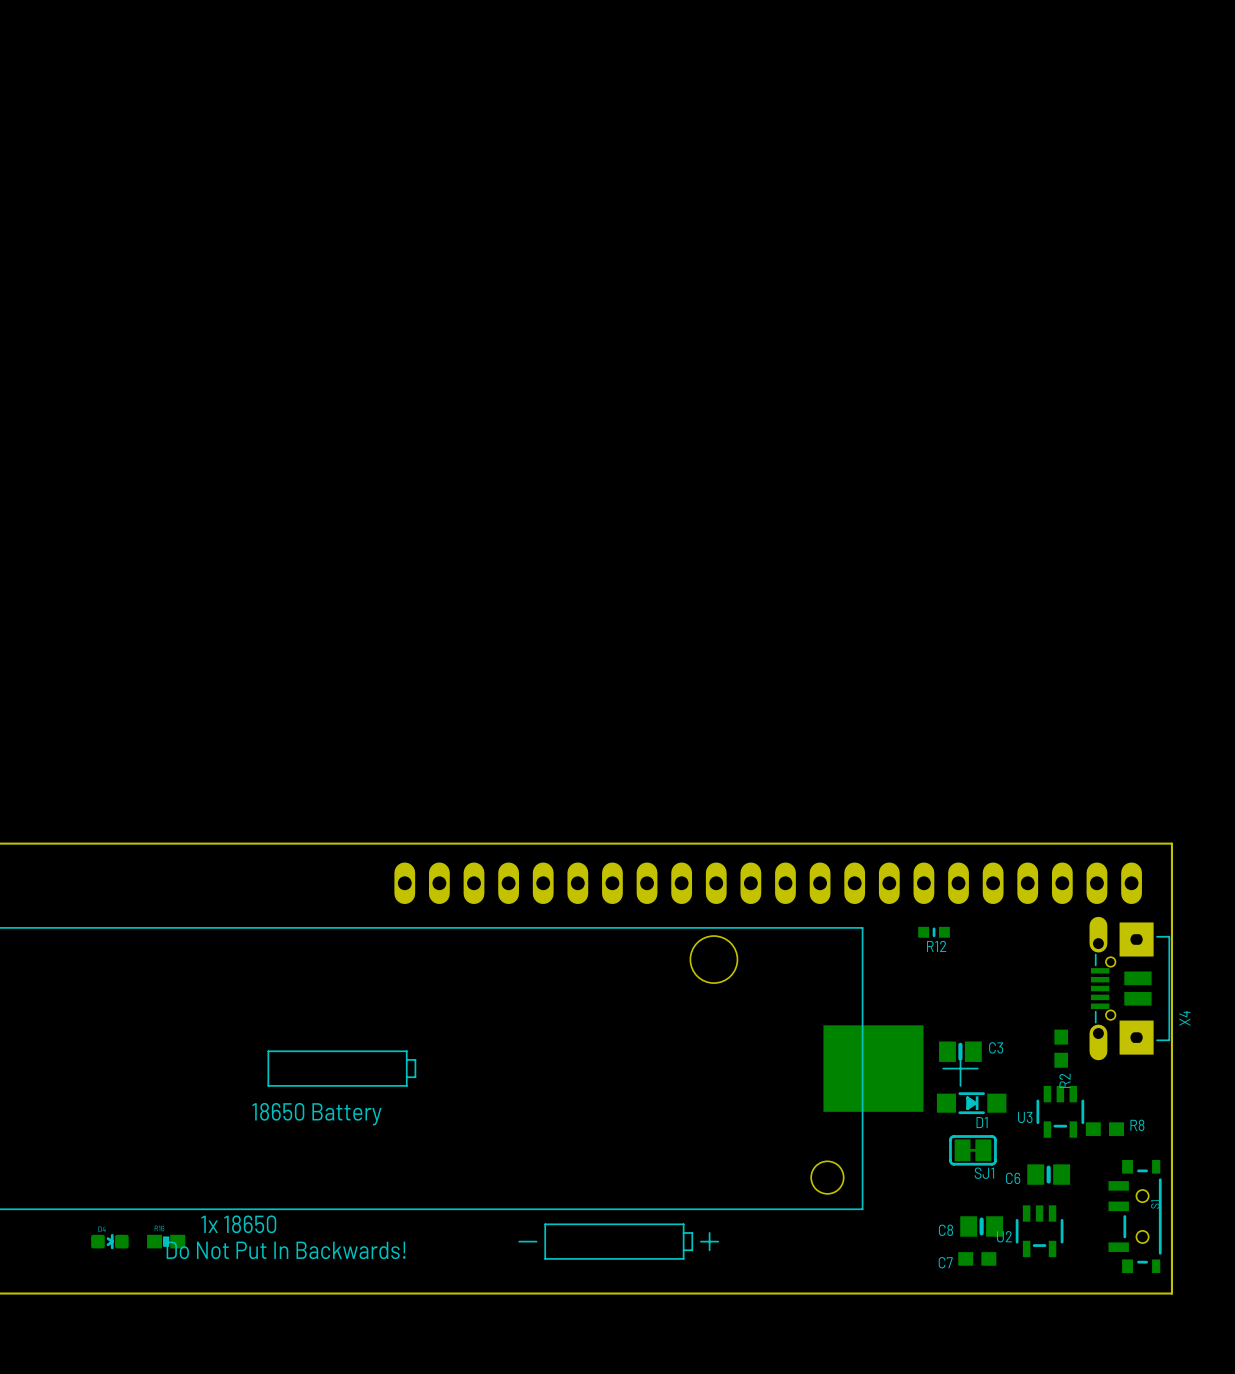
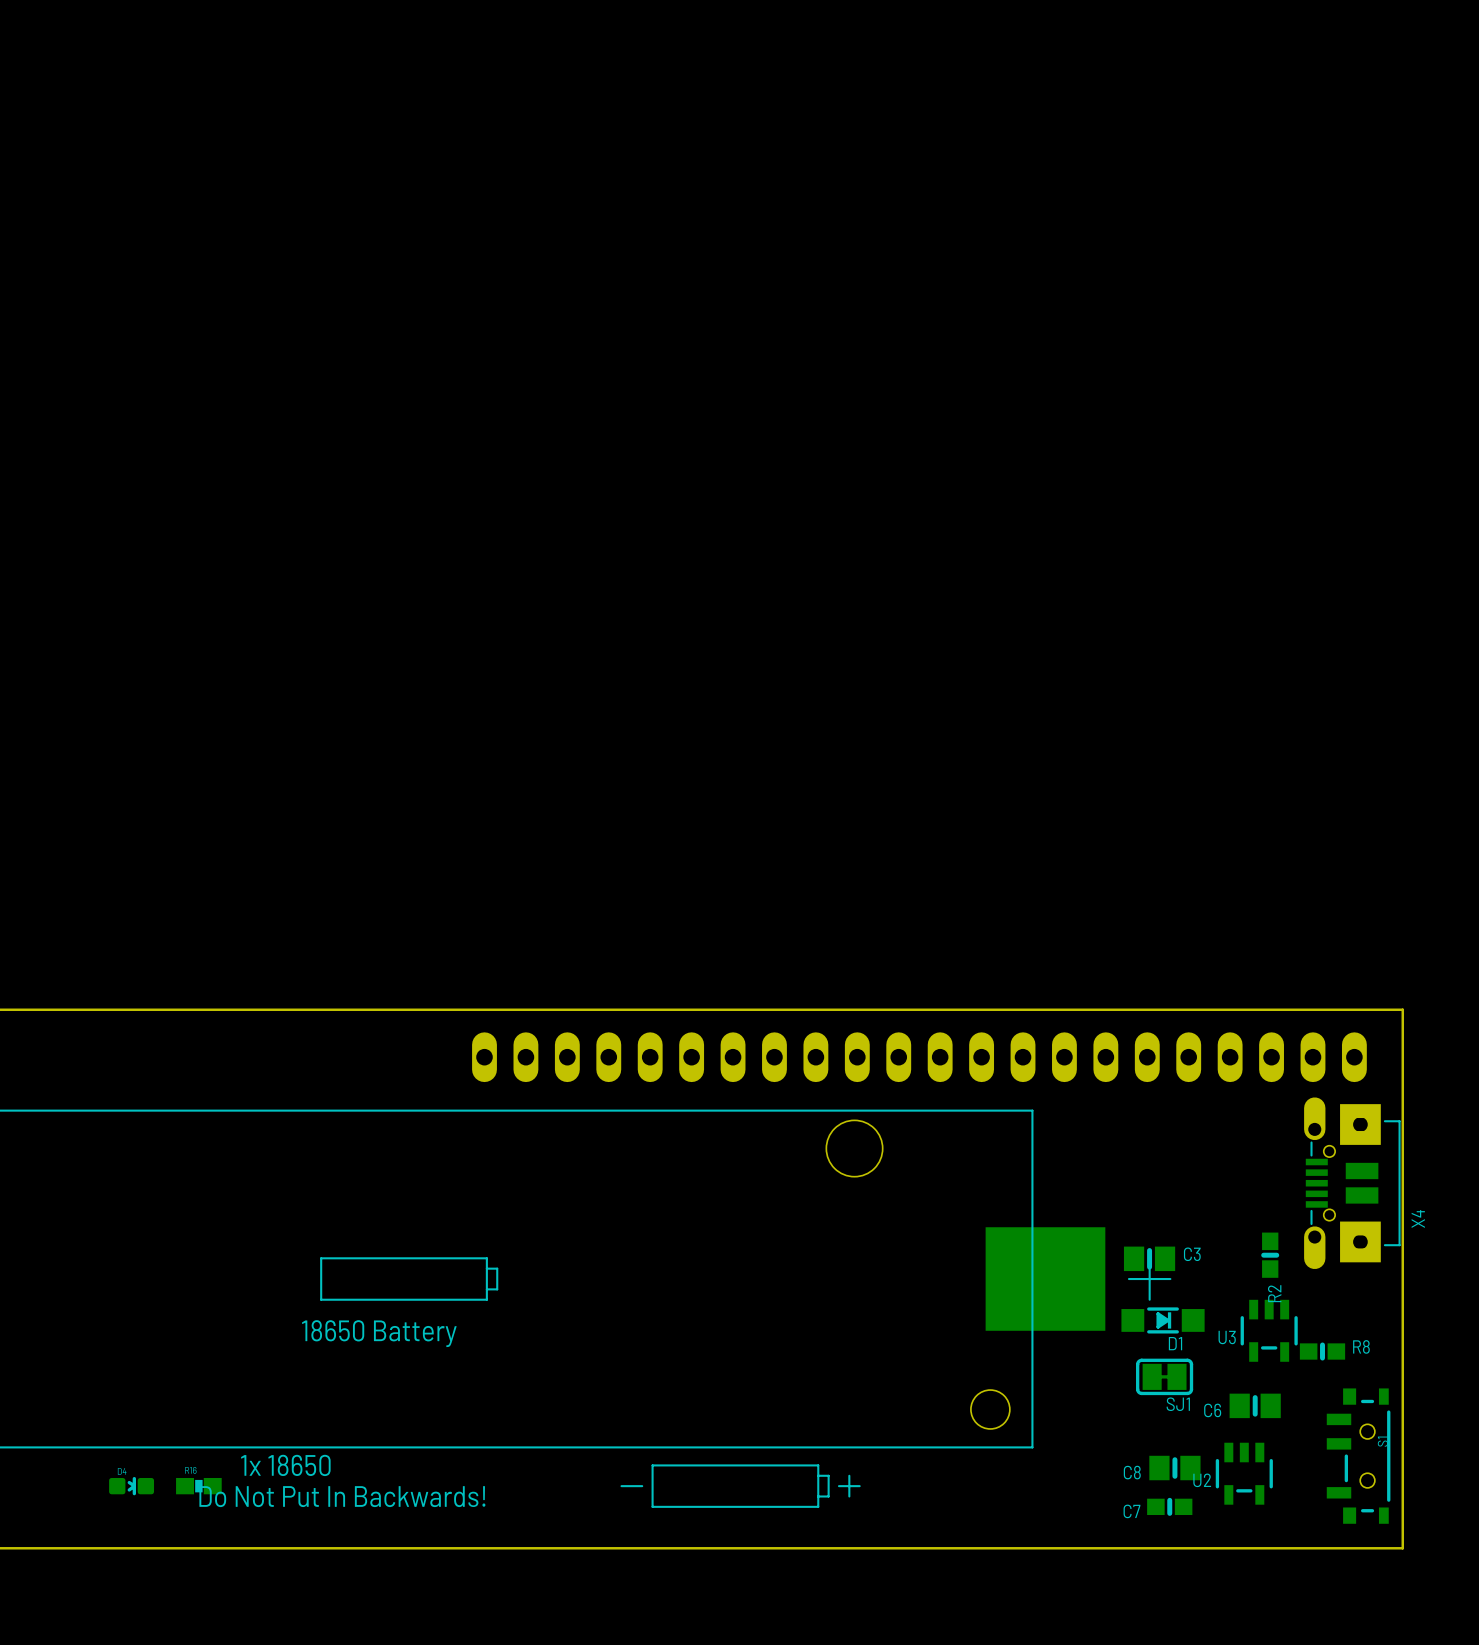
R12: (934, 932) -> none
R2 footprint: [1054, 1029, 1069, 1068] -> [1261, 1232, 1280, 1278]
R8 footprint: [1085, 1122, 1124, 1136] -> [1299, 1342, 1346, 1361]
C7 footprint: [958, 1252, 997, 1266] -> [1147, 1497, 1193, 1516]

